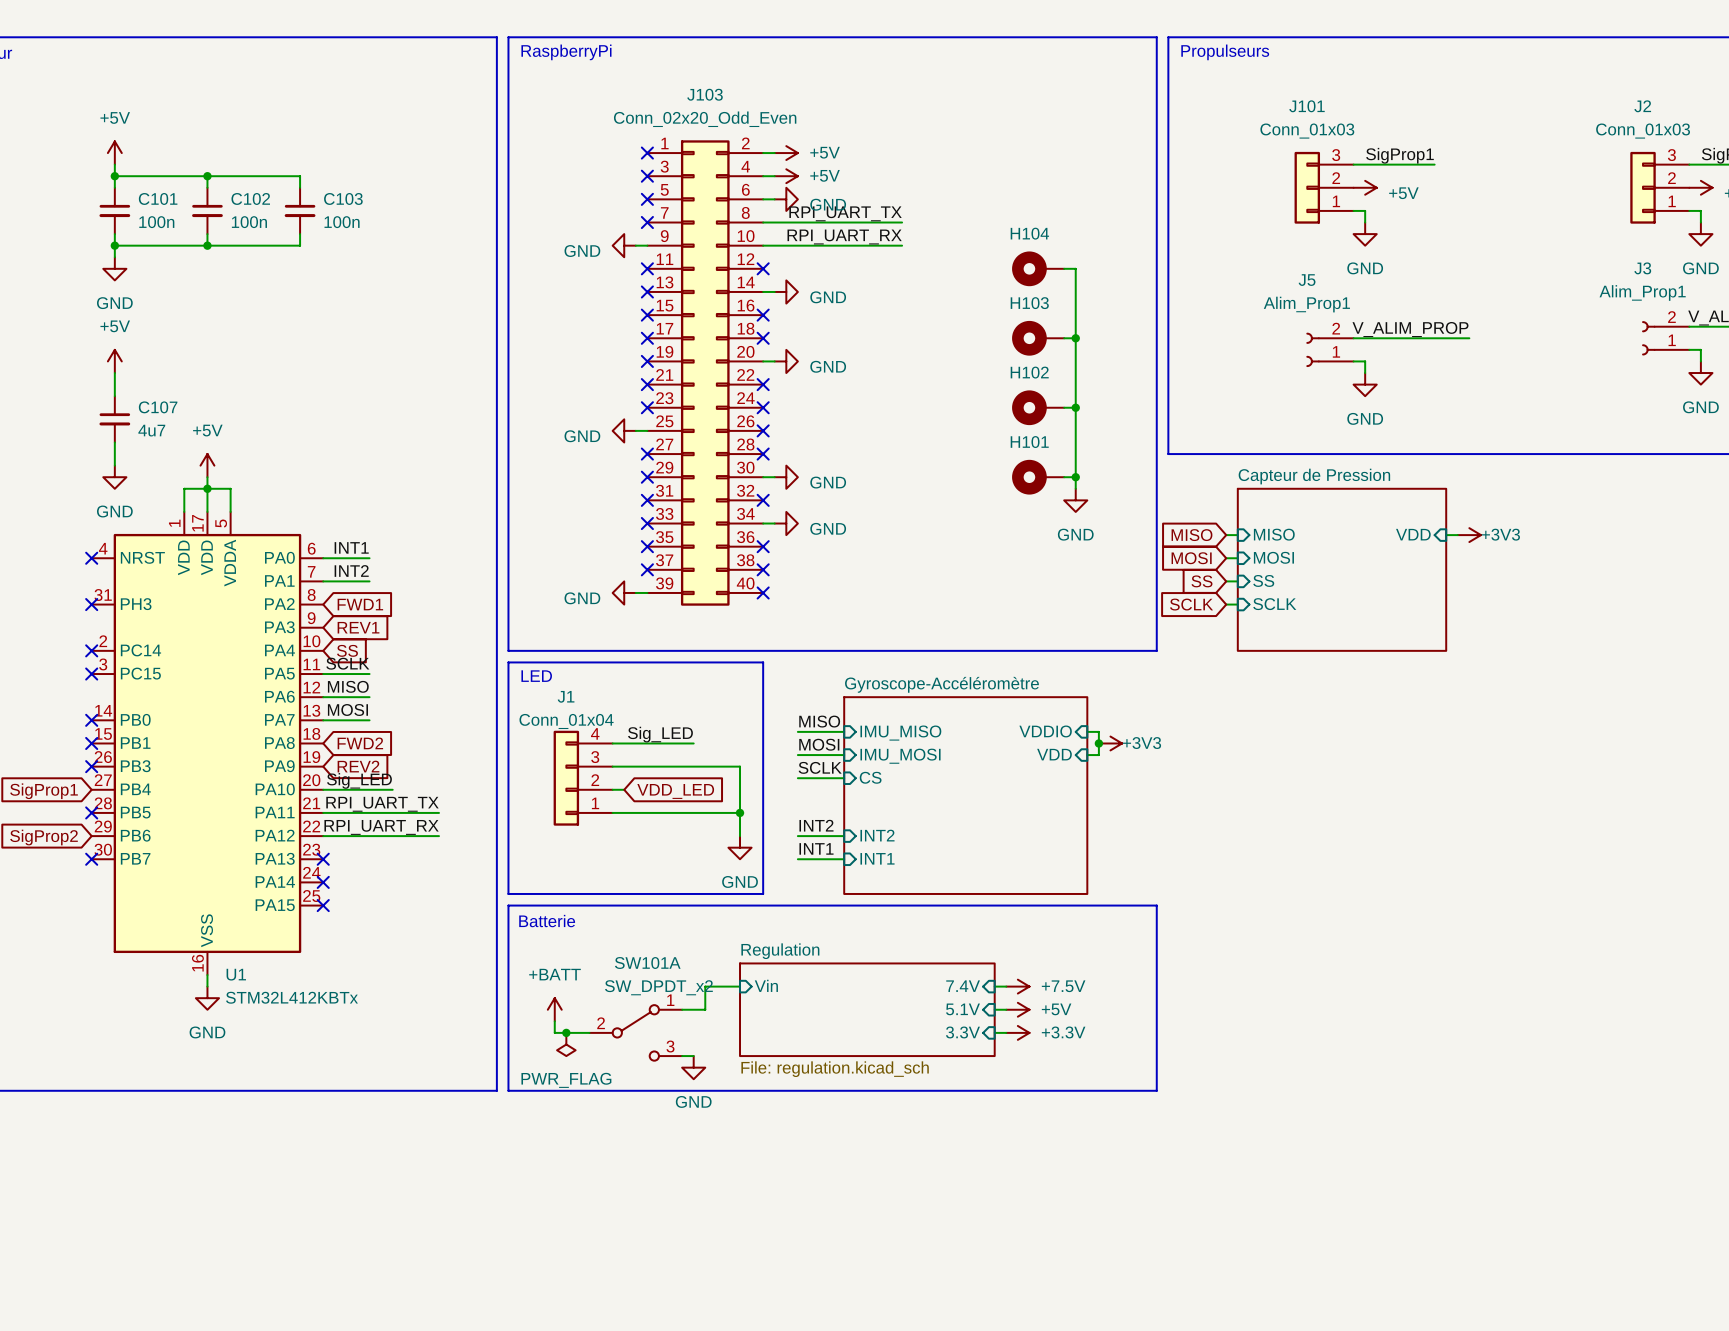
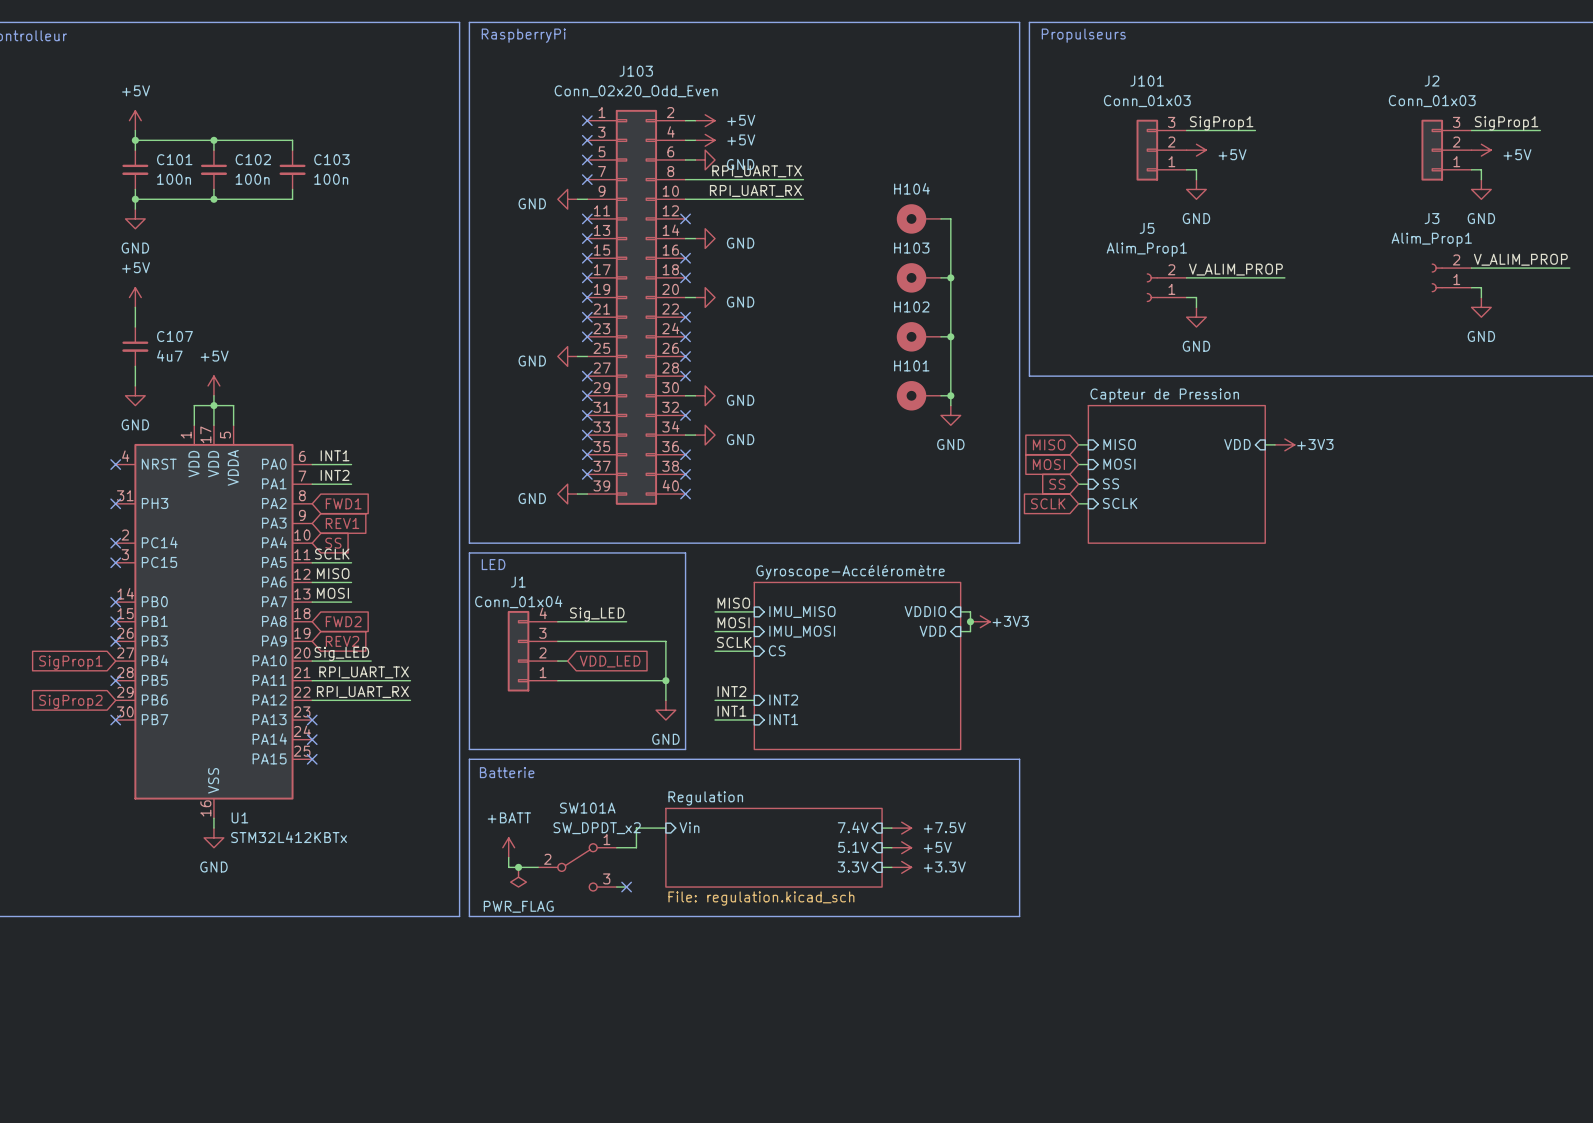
no-connect mark: none -> (626, 887)
power symbol: GND (693, 1067) -> none

